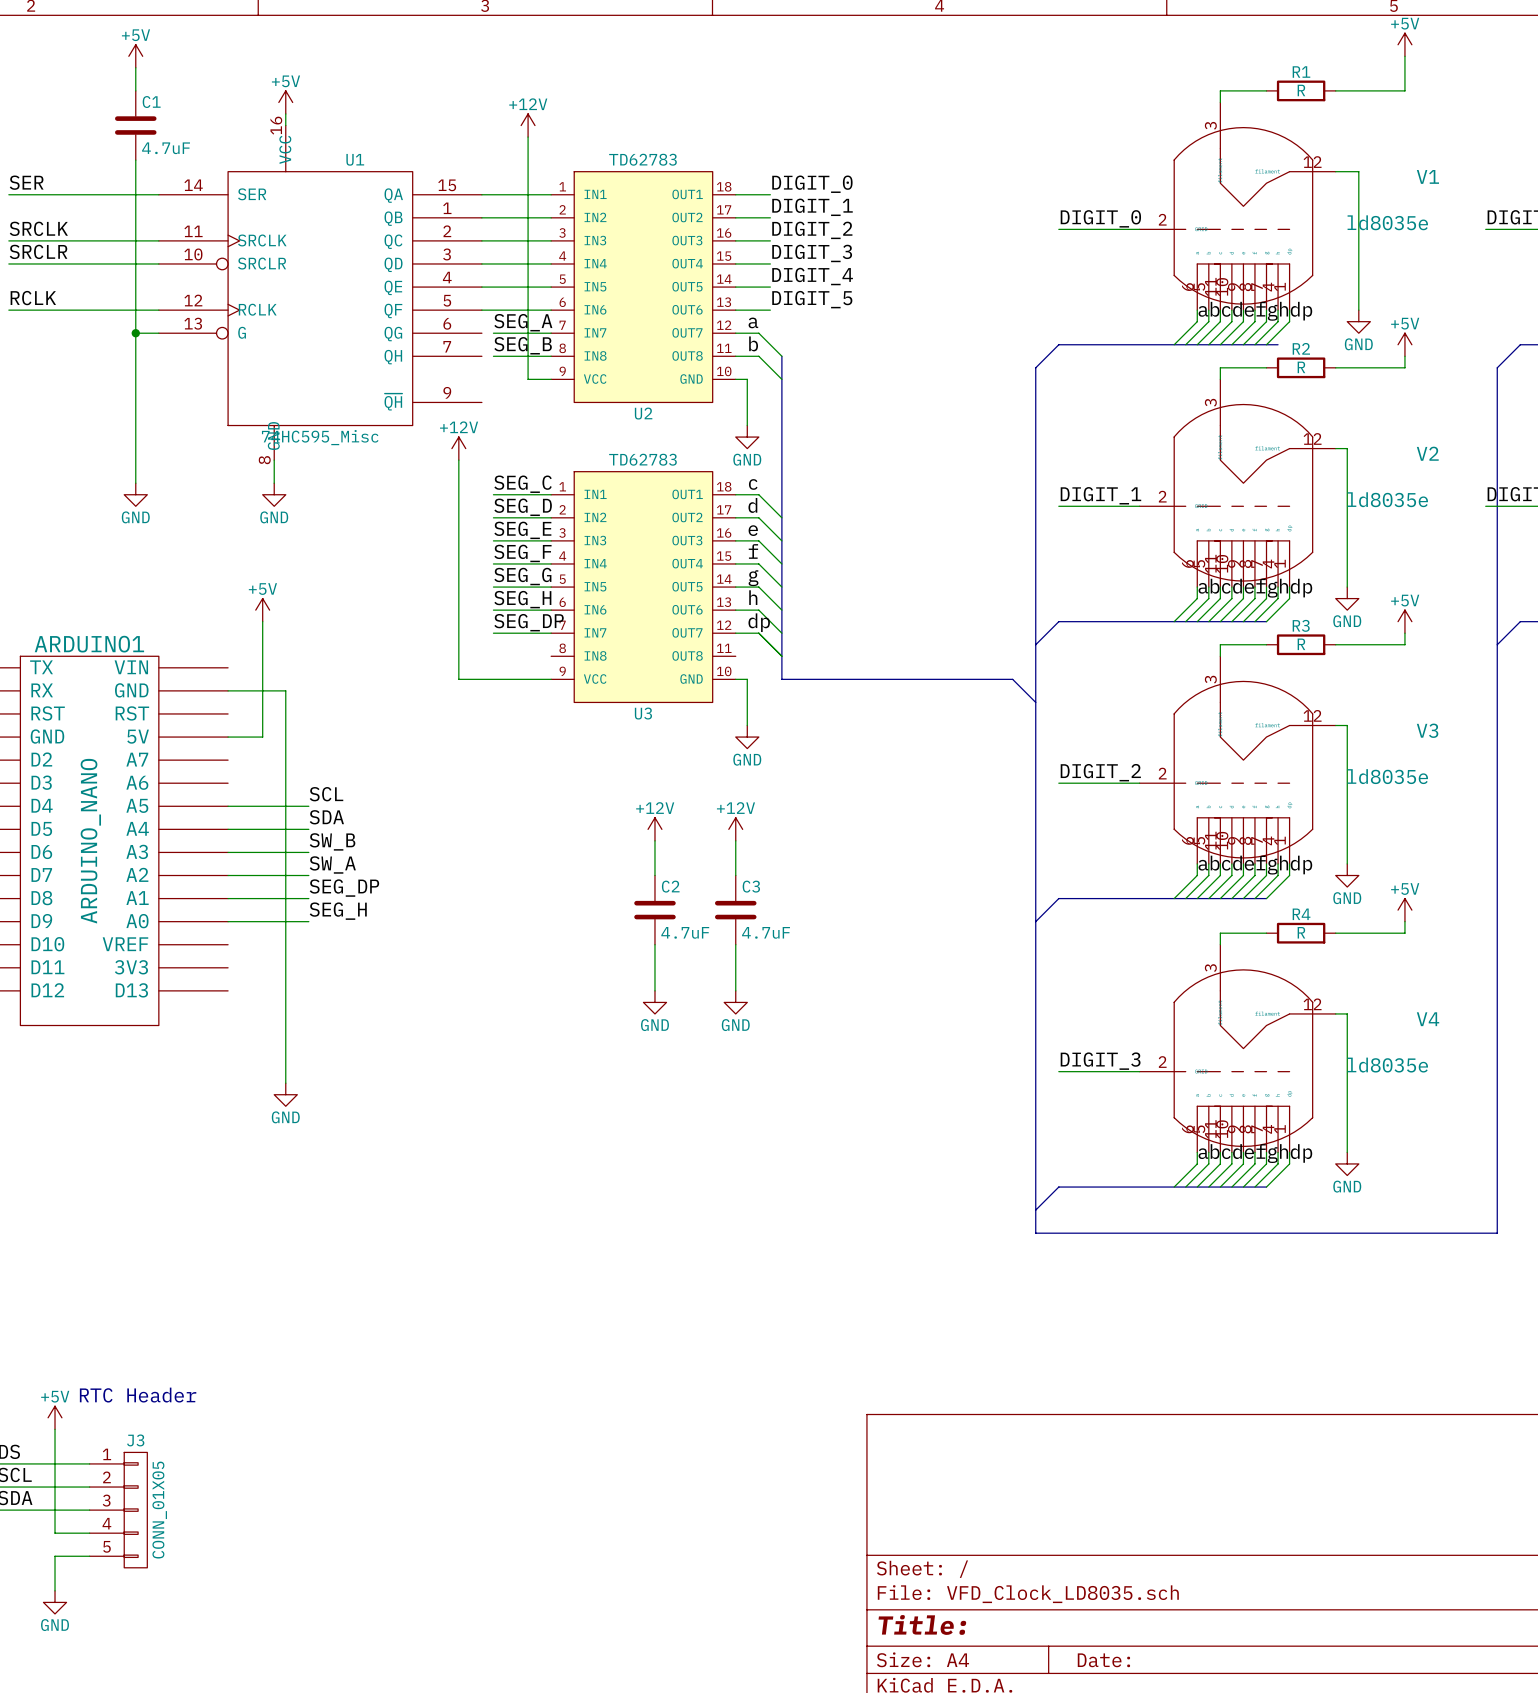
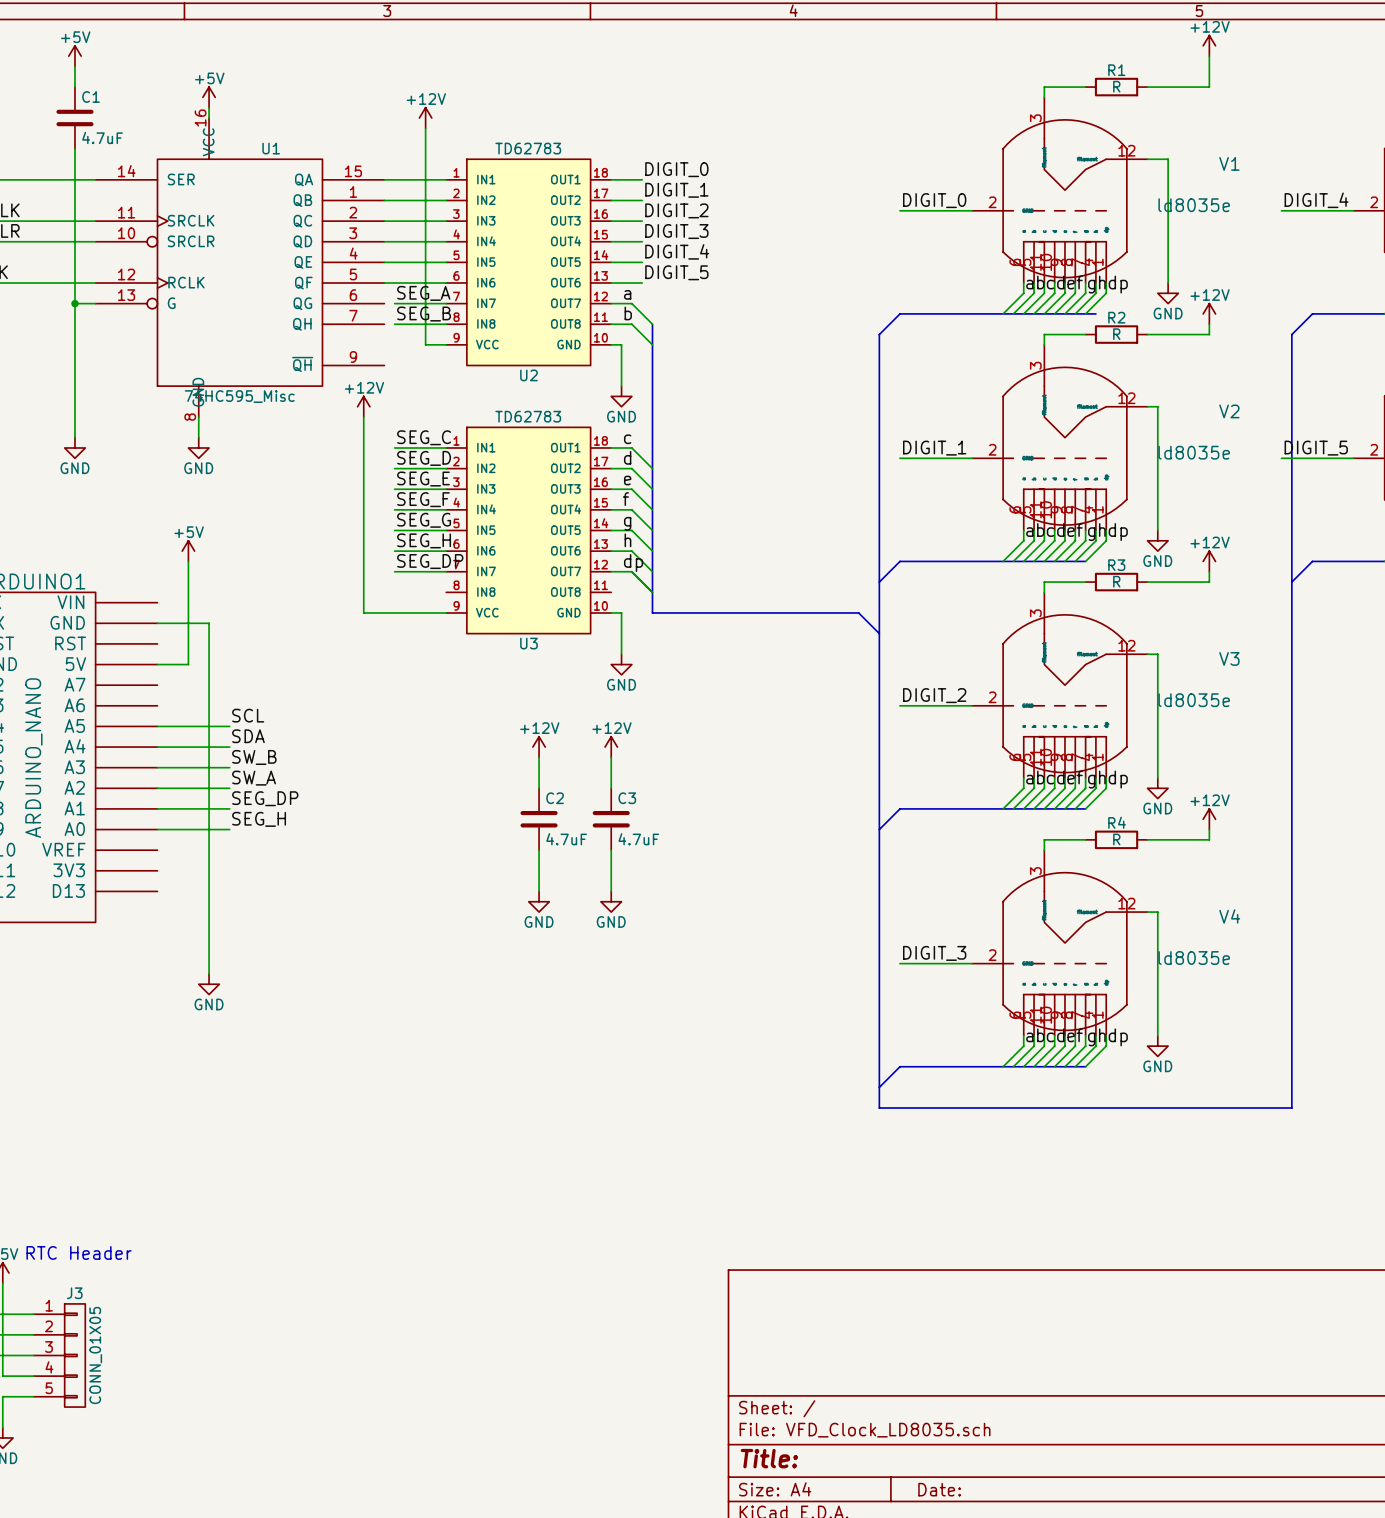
power symbol: +5V (1404, 44) -> +12V (1209, 45)
power symbol: +5V (1404, 344) -> +12V (1209, 313)
power symbol: +5V (1404, 621) -> +12V (1209, 561)
power symbol: +5V (1404, 910) -> +12V (1209, 819)

